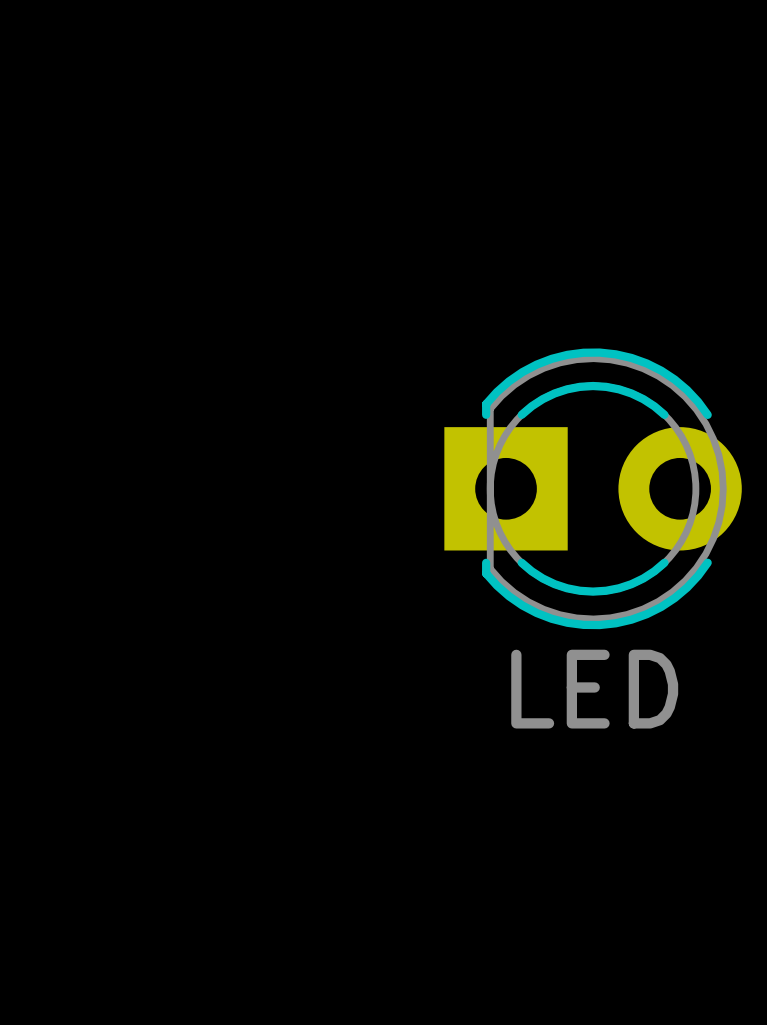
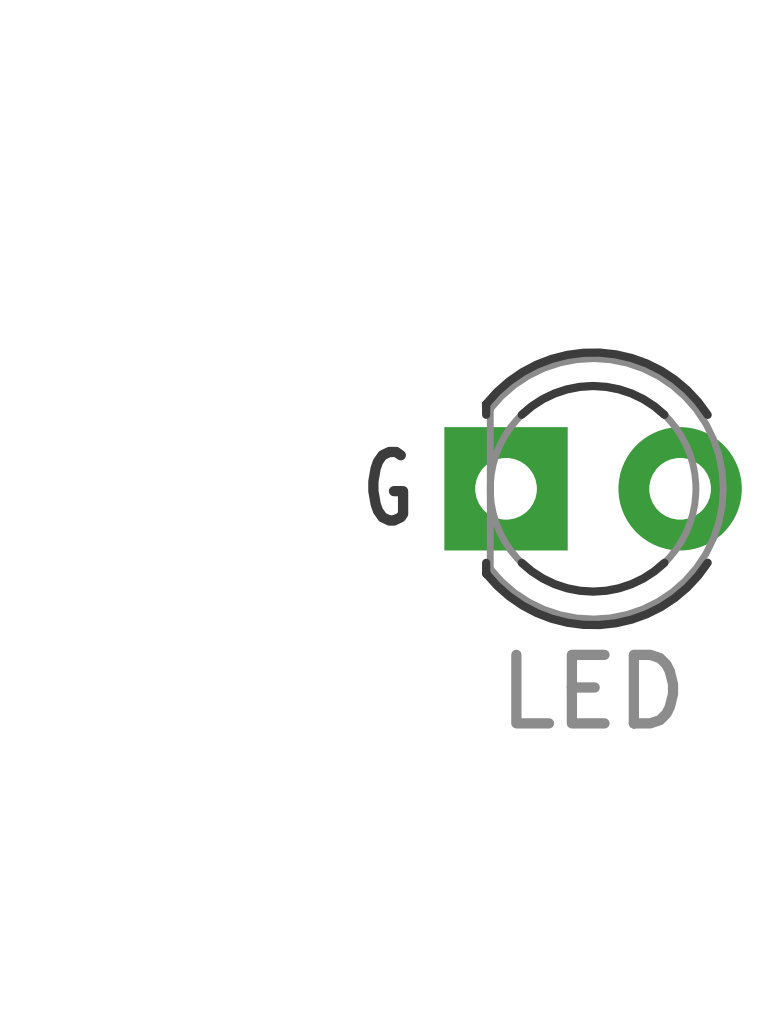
text: none -> G (388, 486)

